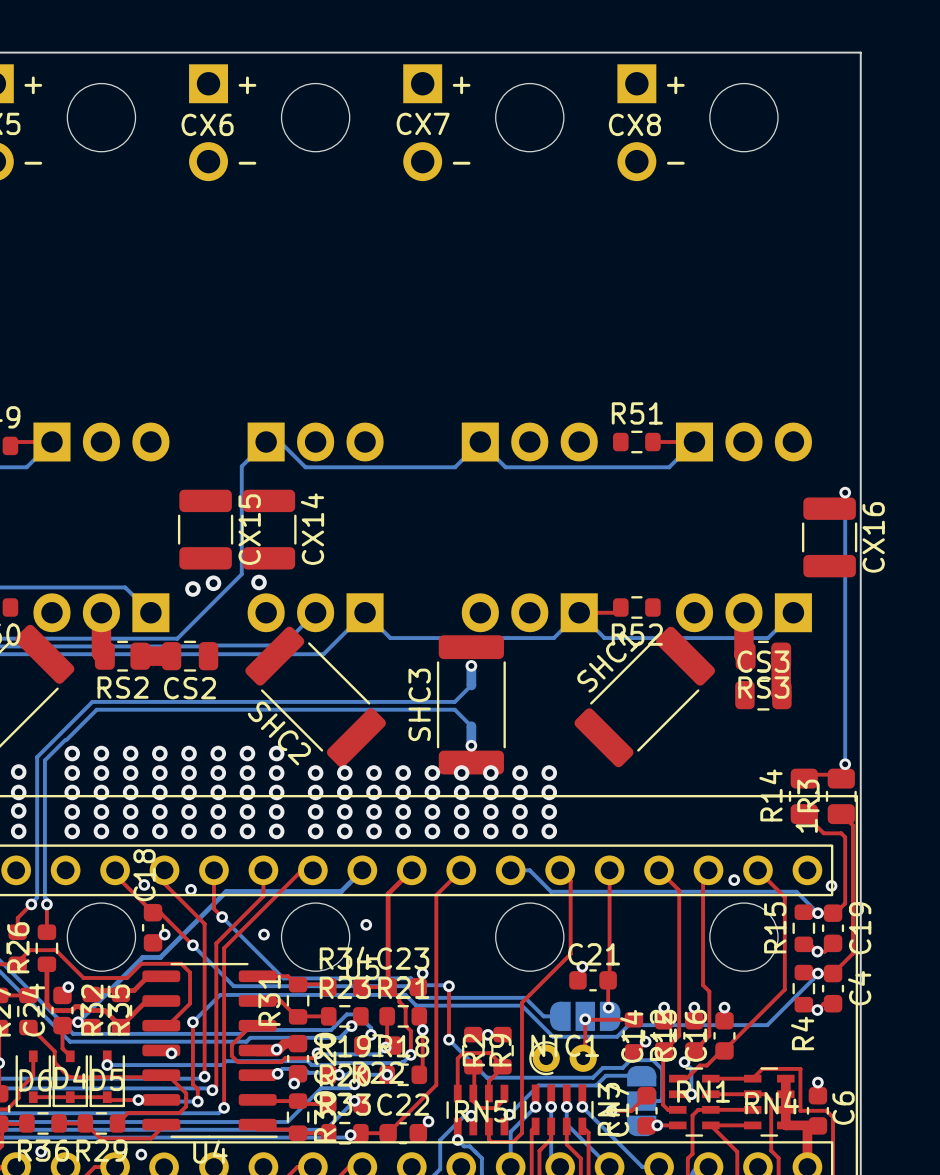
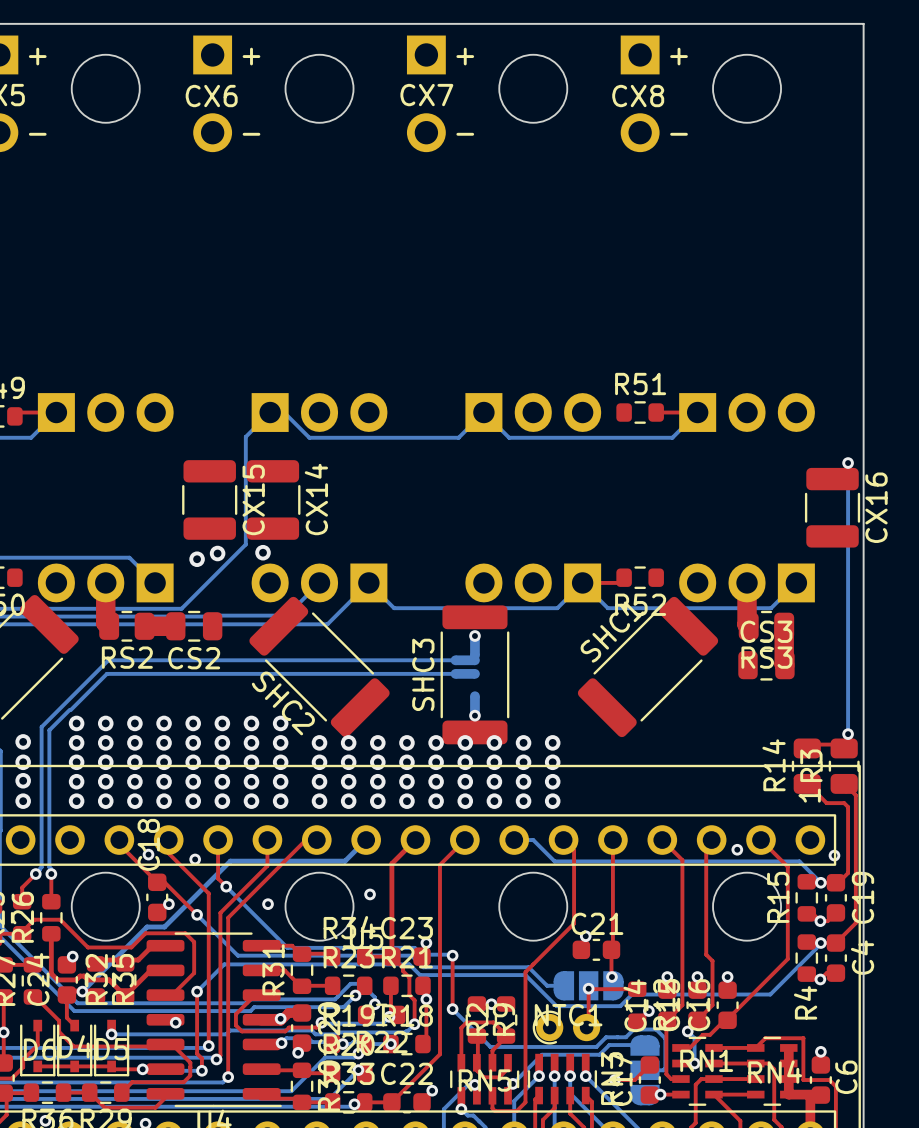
bottom track: (471, 685) (454, 701) (92, 701) -> (455, 660) (108, 660) (96, 671)
part: none -> (465, 660)
part: none -> (465, 673)
bottom track: (96, 709) (454, 709) (471, 726) -> (101, 679) (106, 673) (455, 673)

